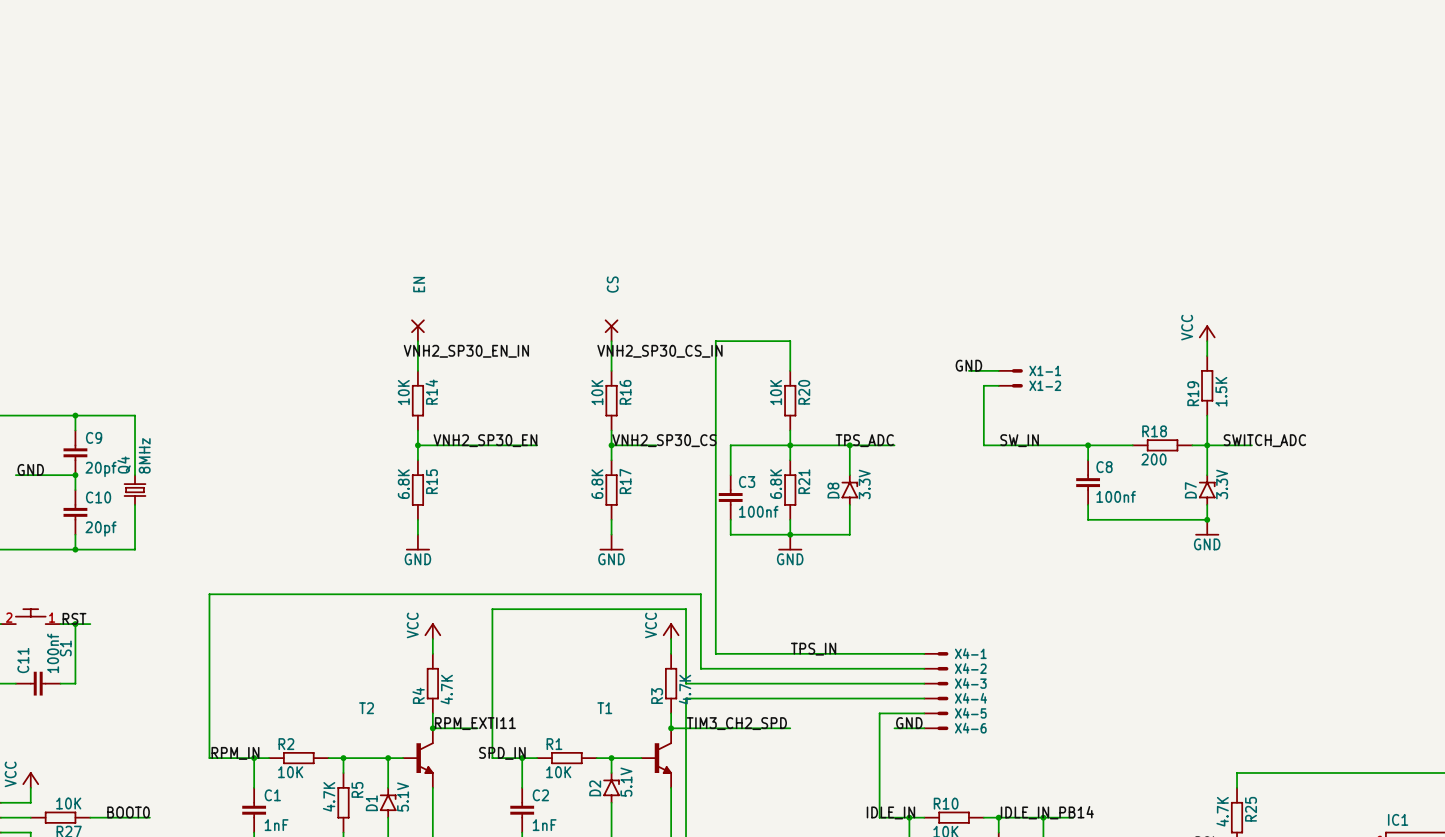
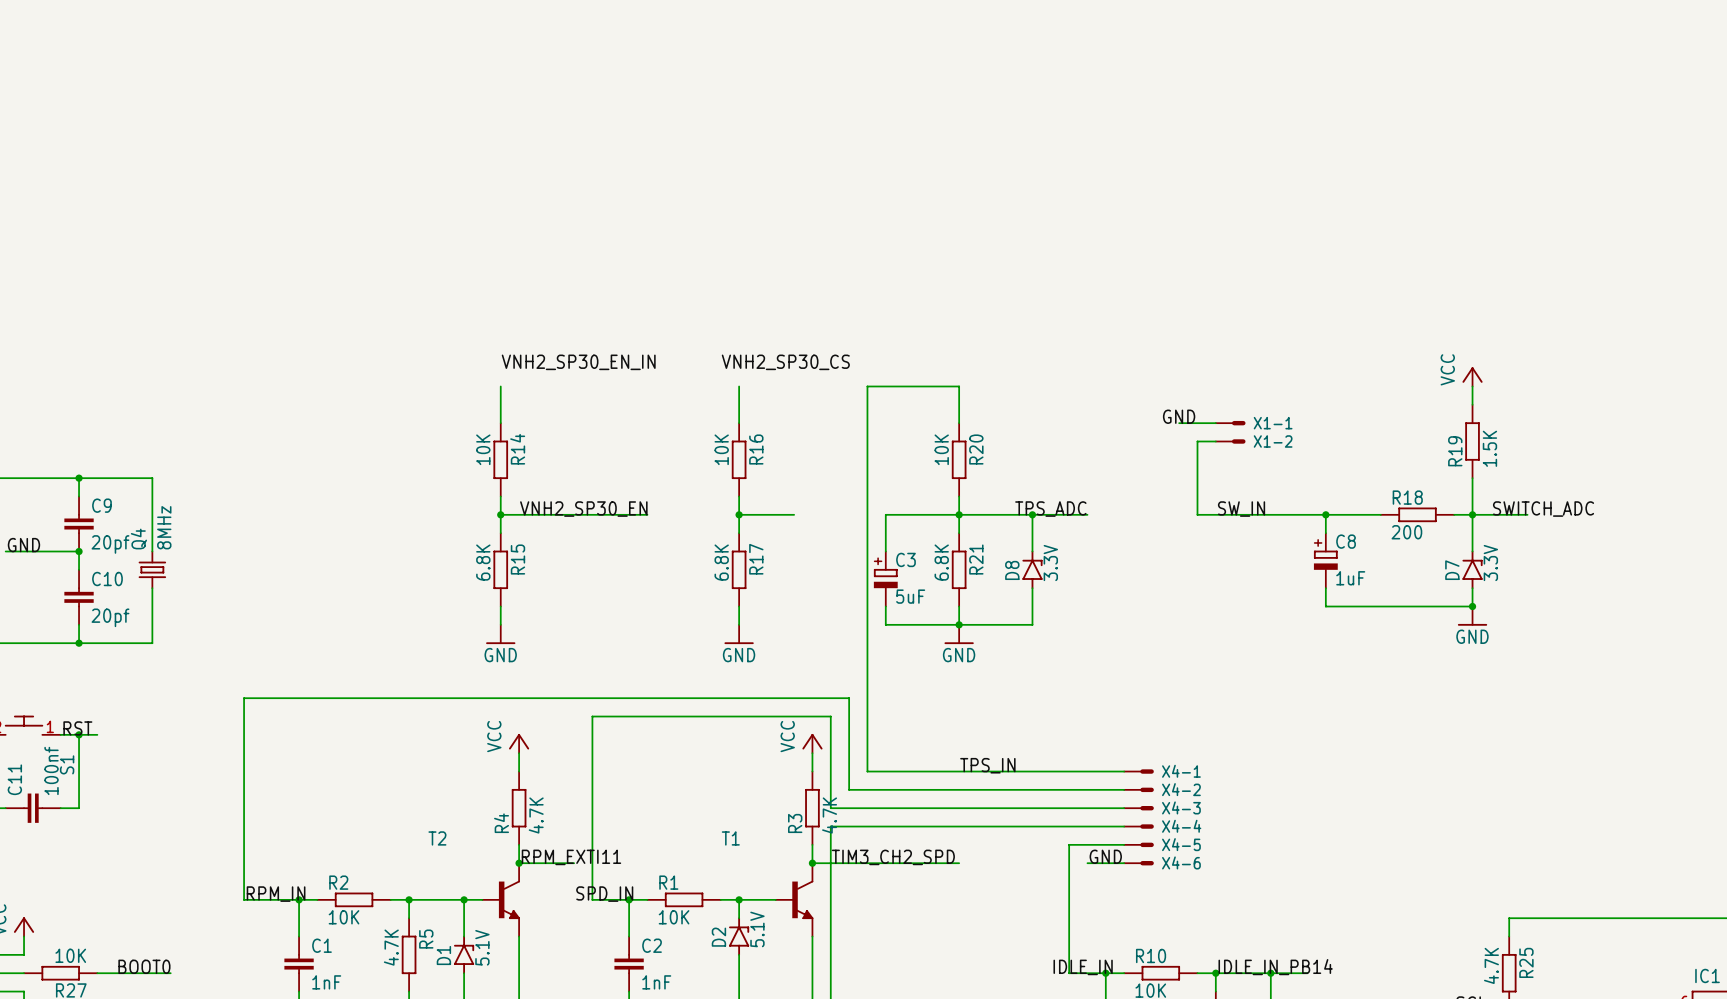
EN: (417, 330) -> none
CS: (611, 330) -> none
label position: VNH2_SP30_EN_IN (466, 351) -> VNH2_SP30_EN_IN (578, 362)
label: VNH2_SP30_CS_IN (659, 351) -> none
label position: VNH2_SP30_CS (664, 440) -> VNH2_SP30_CS (785, 362)
C8 symbol: [1076, 460, 1101, 505] -> [1313, 533, 1338, 589]
C3 symbol: [718, 475, 743, 520] -> [873, 551, 898, 607]
C8 value: 100nf (1116, 496) -> 1uF (1350, 578)
C3 value: 100nf (758, 511) -> 5uF (910, 596)

